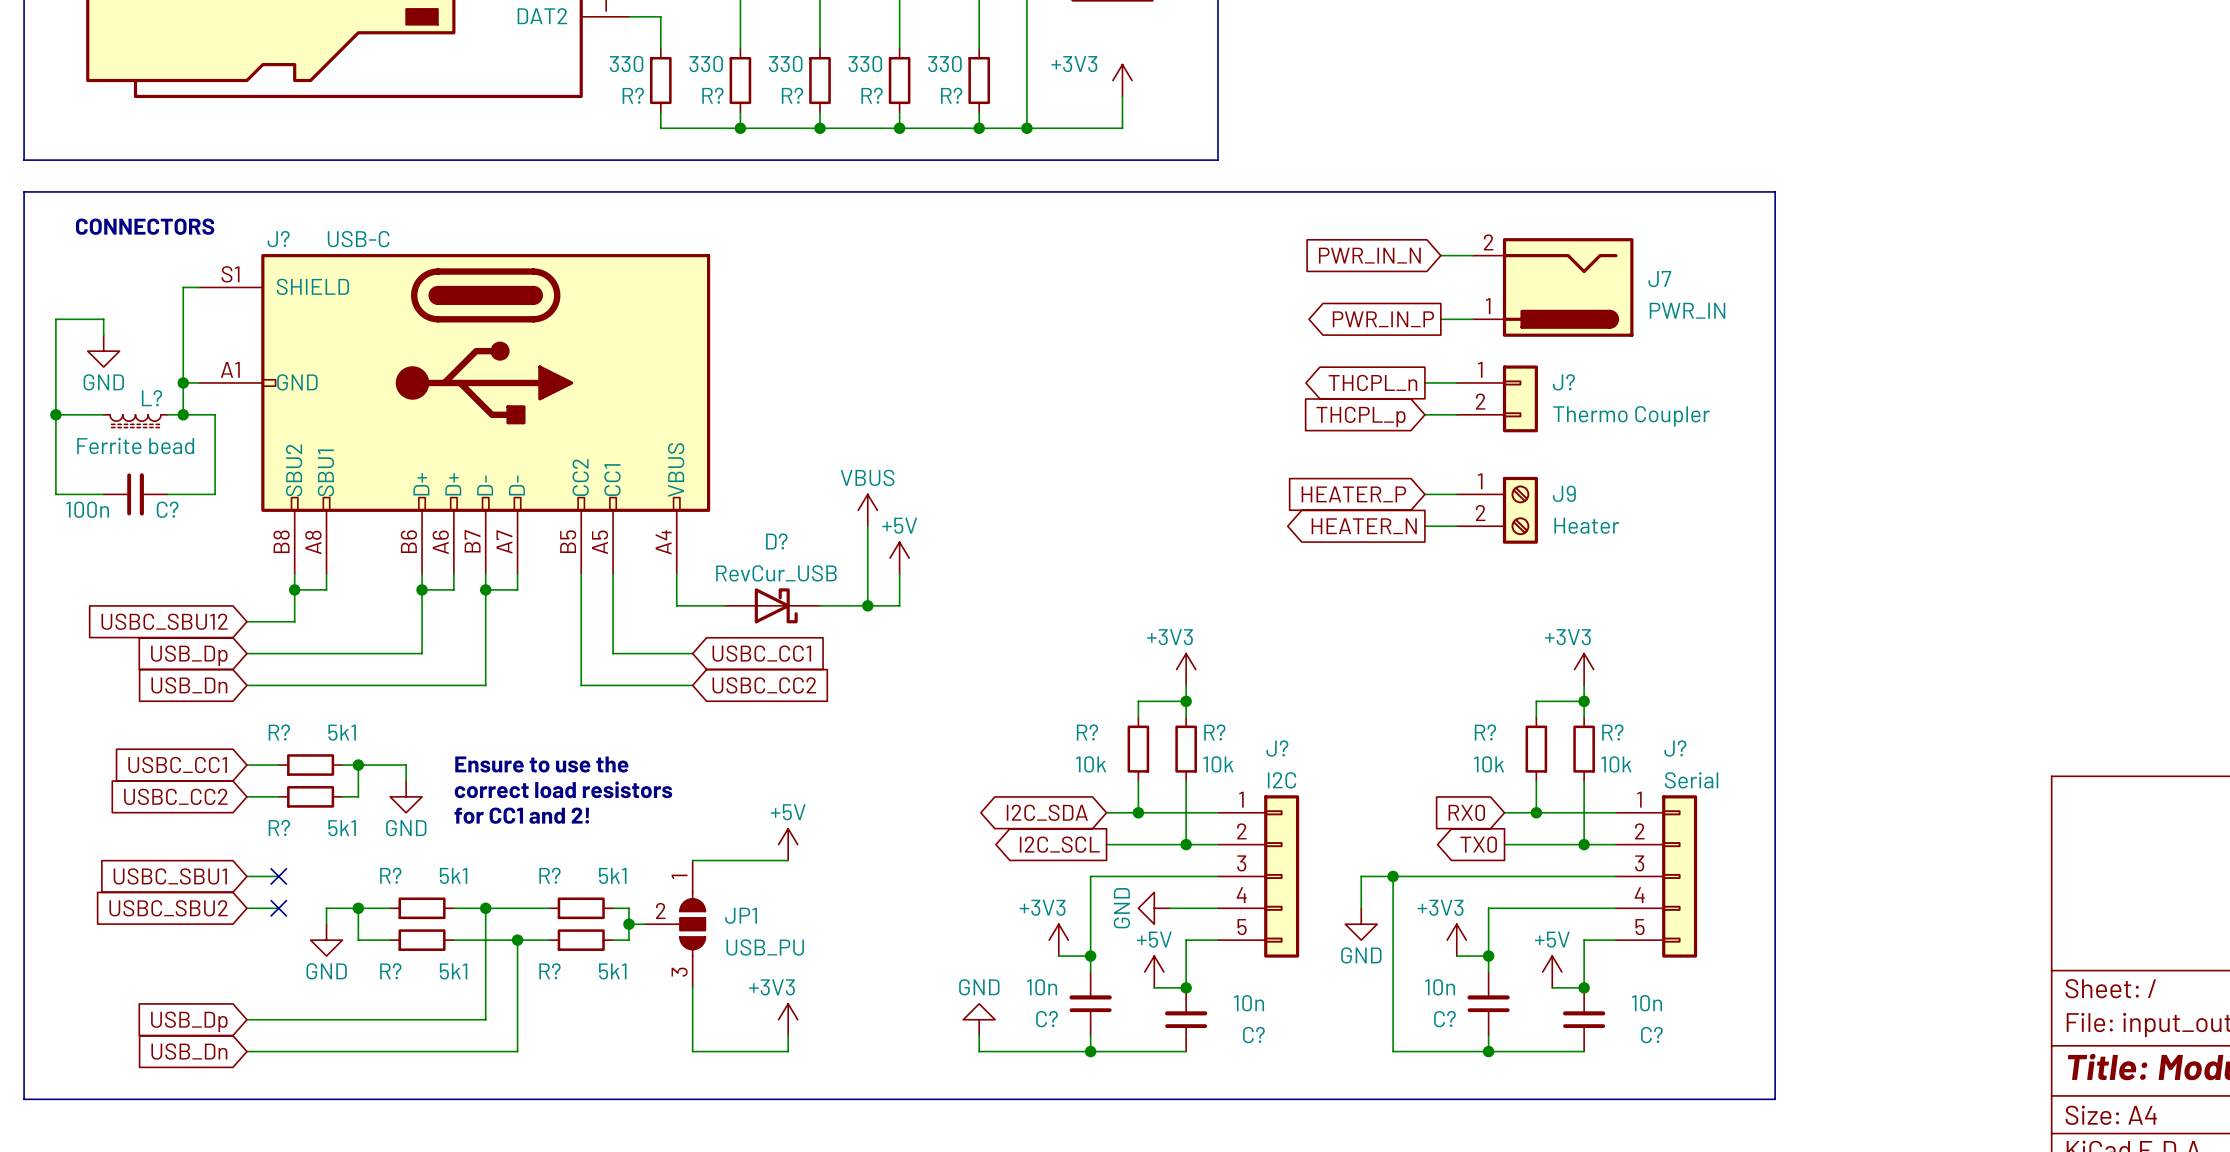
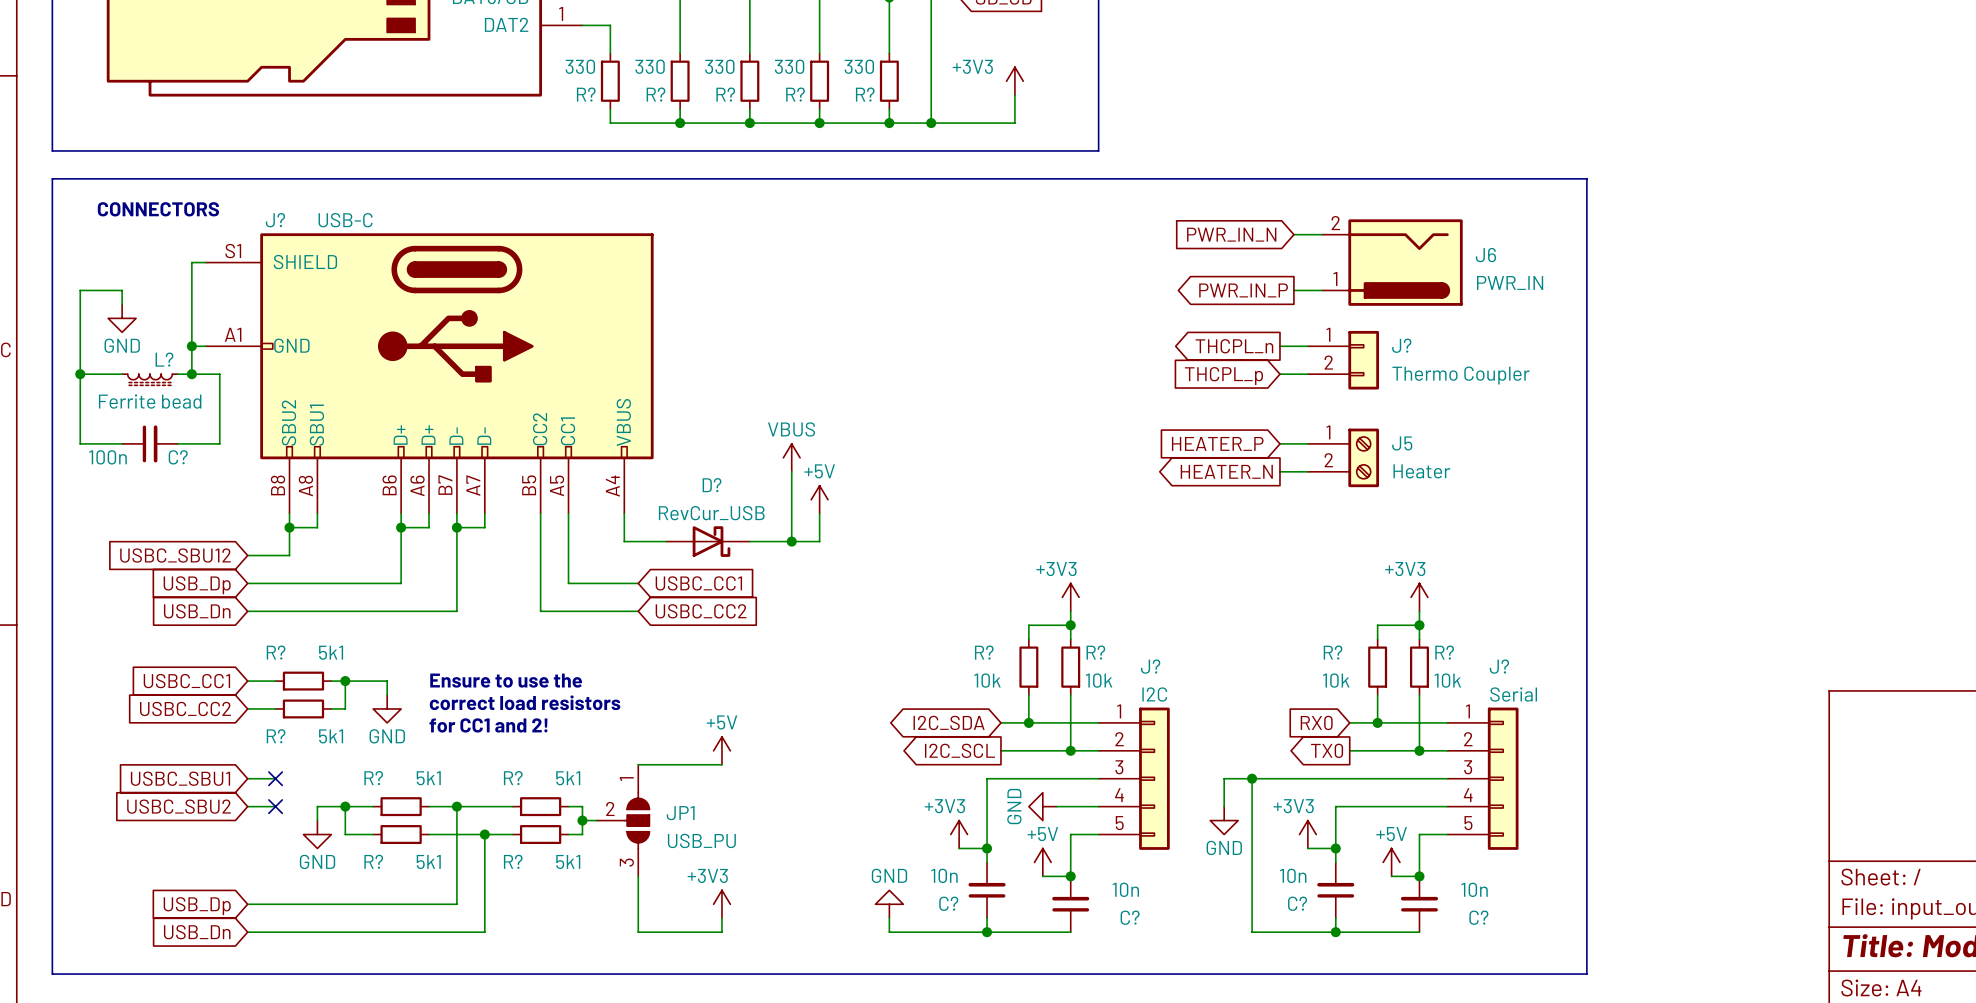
J7 name: J7 (1659, 279) -> J6 (1485, 255)
J9 name: J9 (1564, 493) -> J5 (1402, 443)

